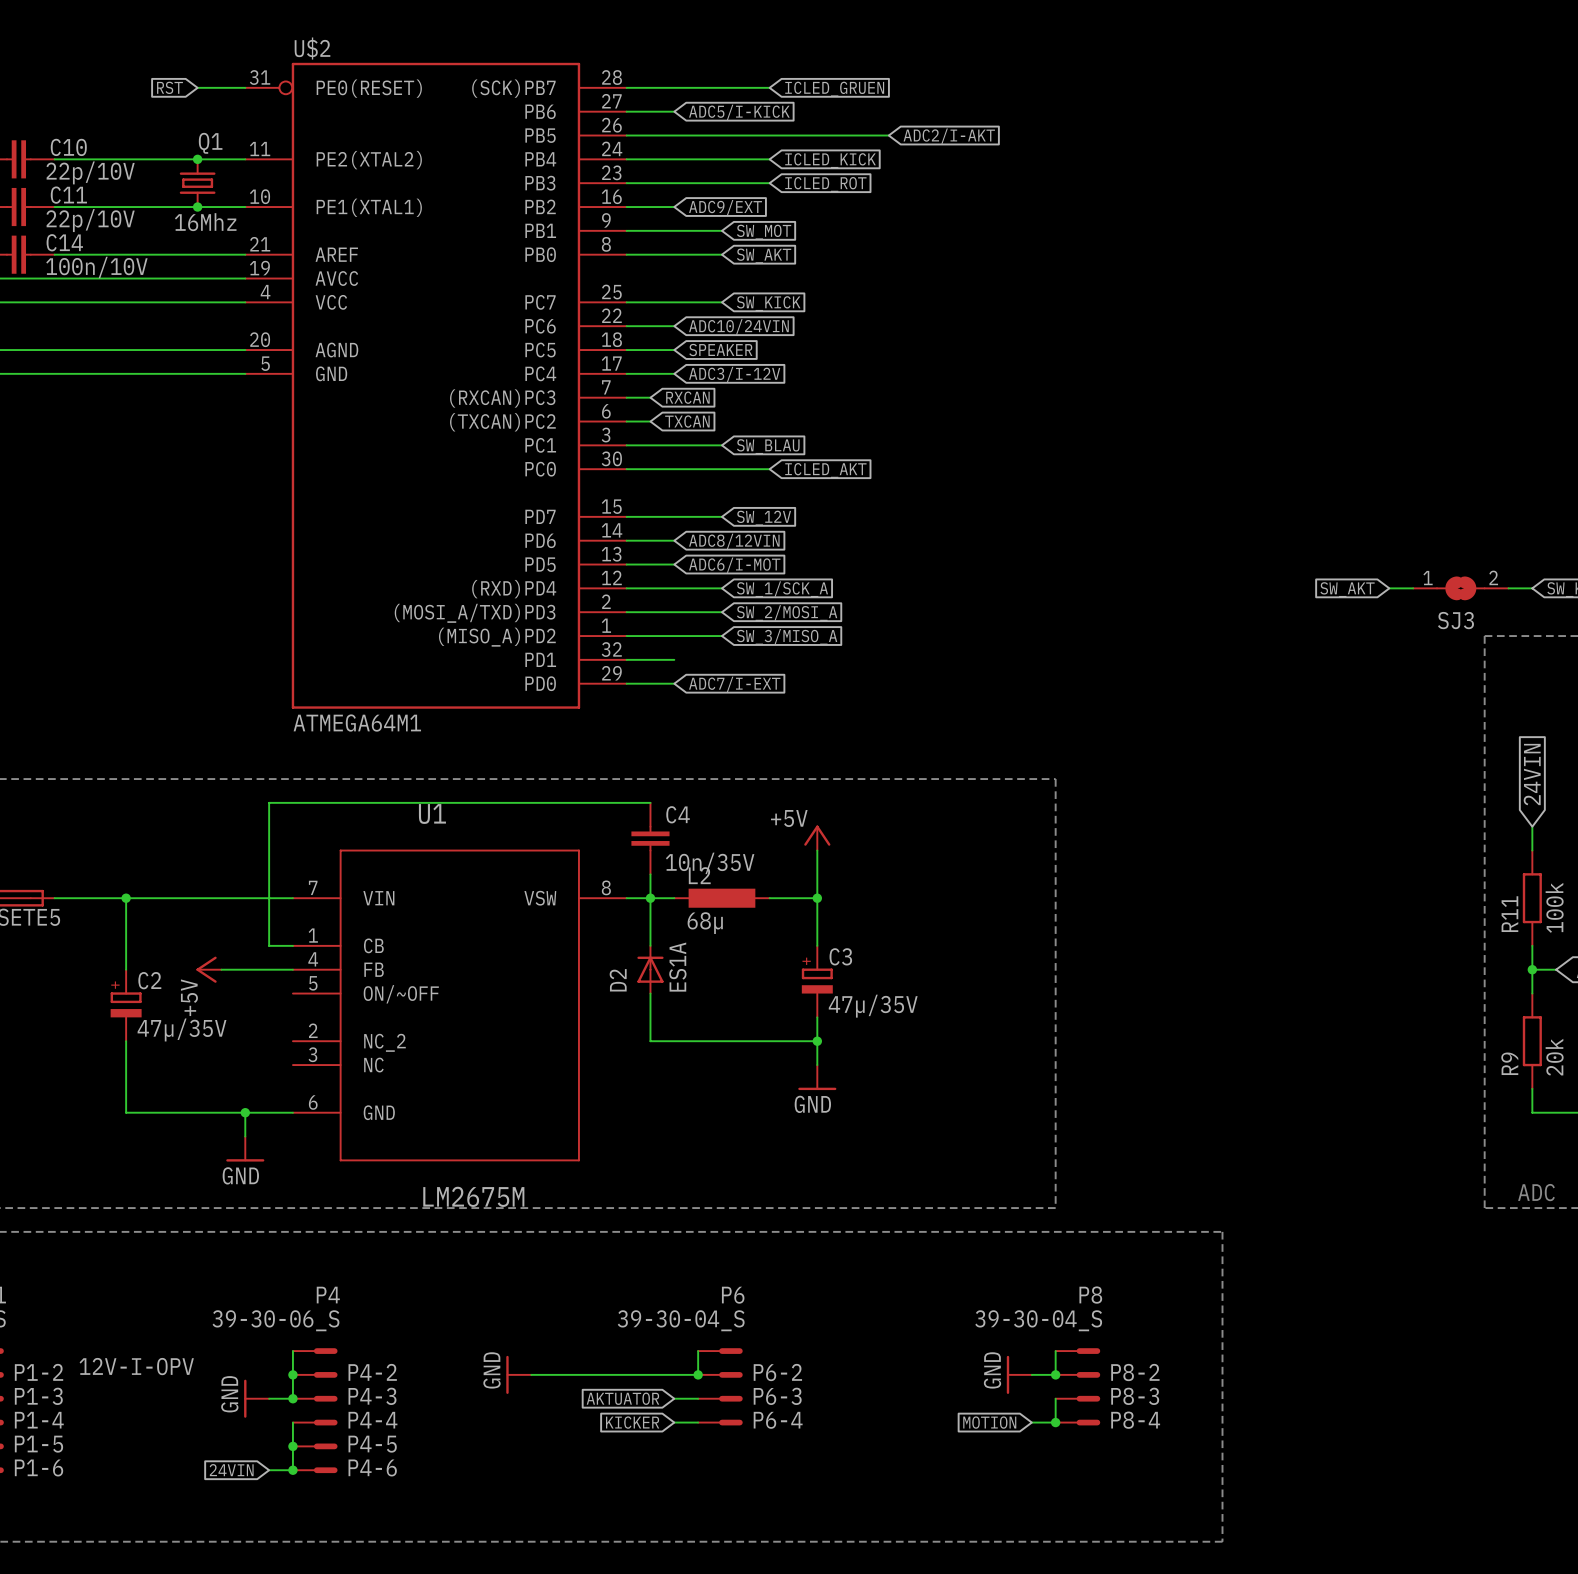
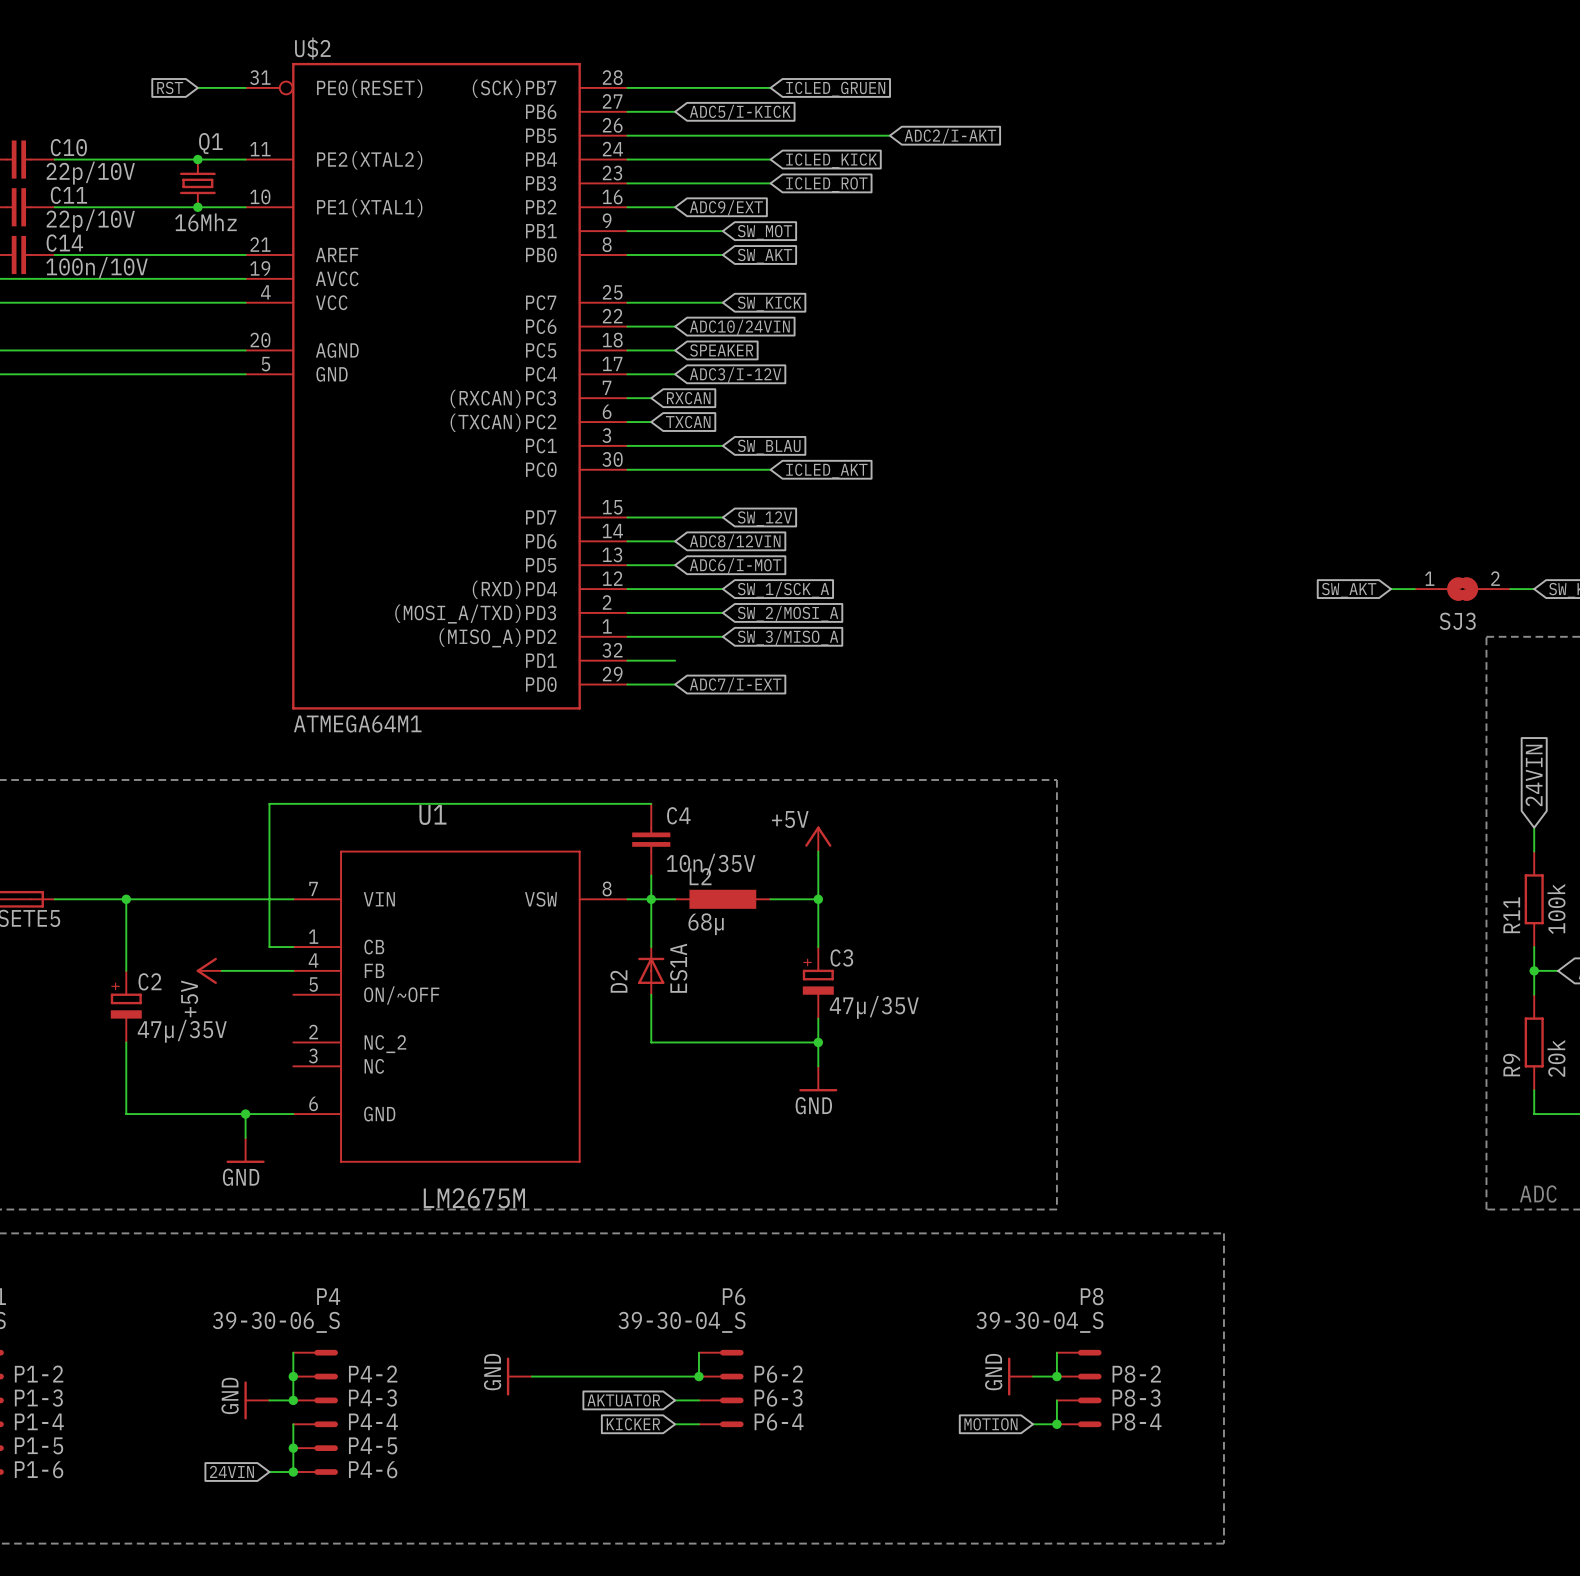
label: 12V-I-OPV (136, 1366) -> none

